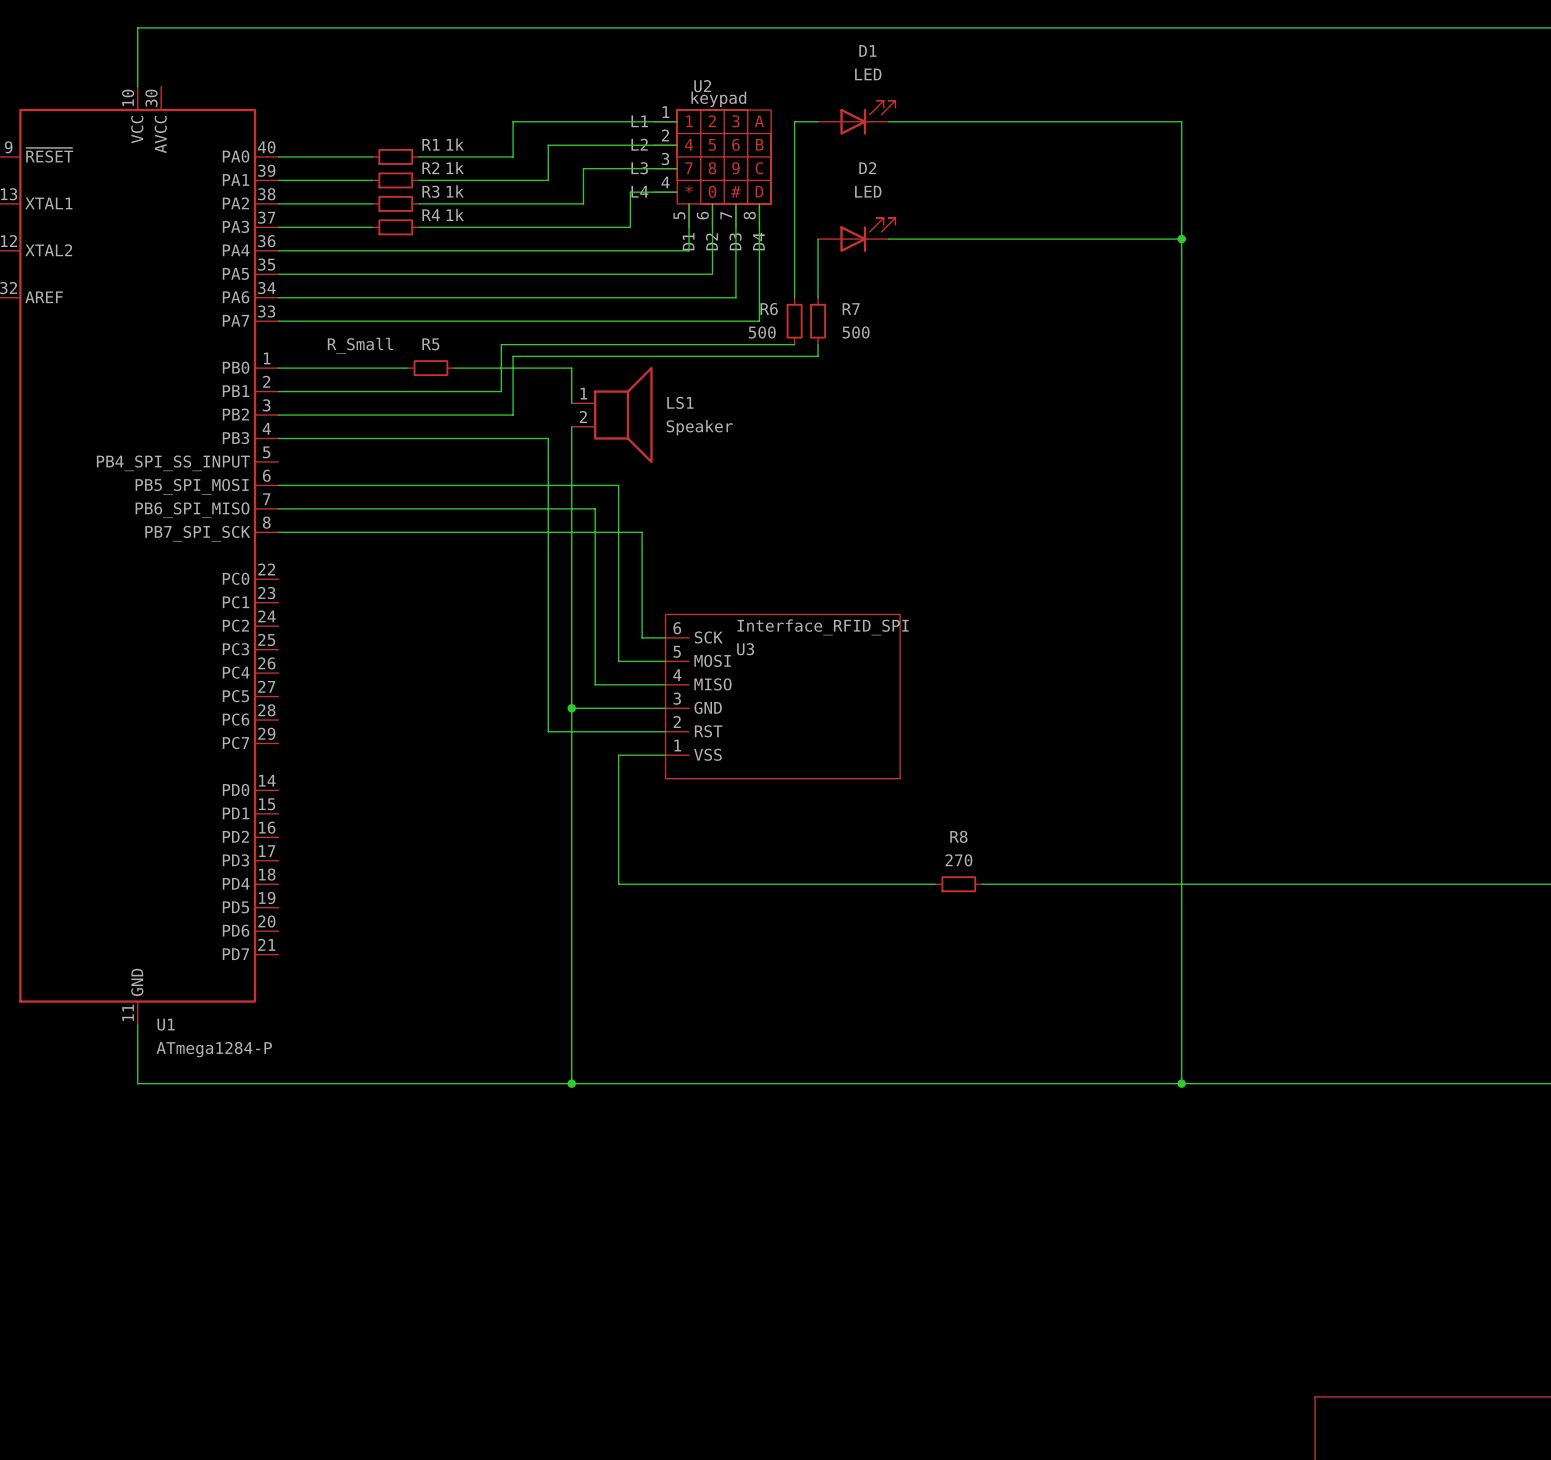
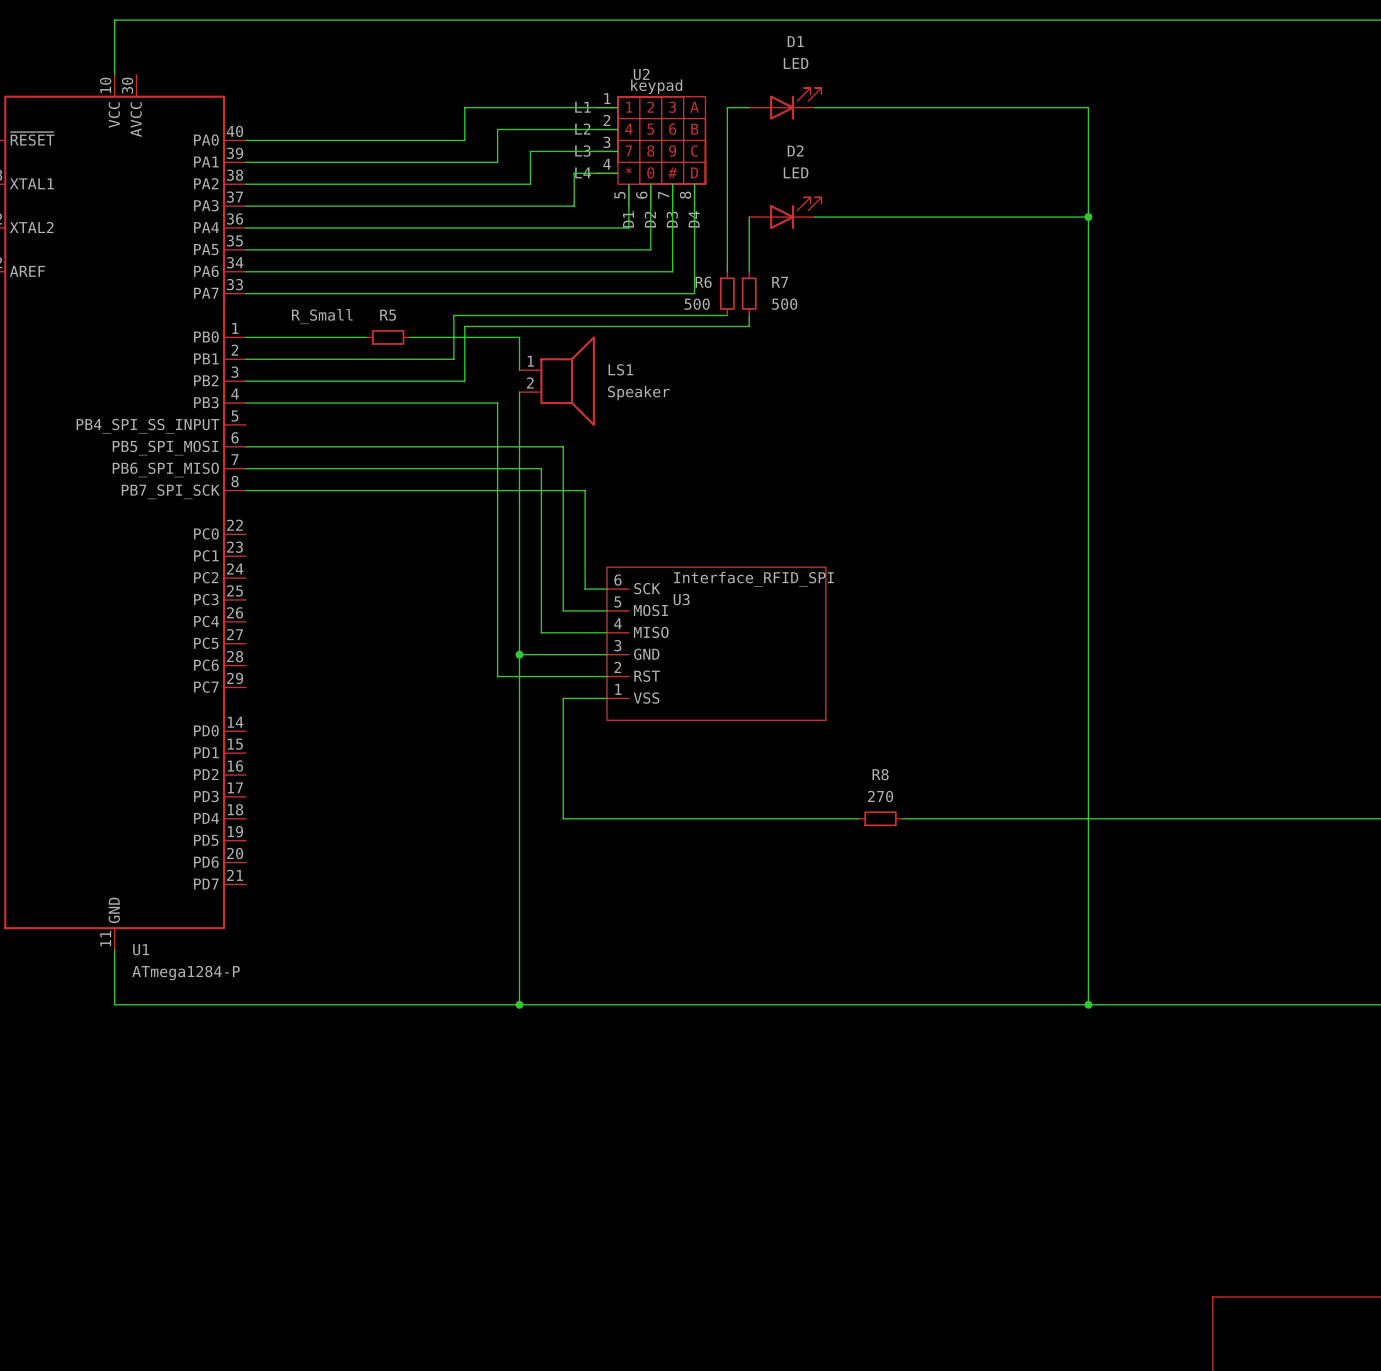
wire: none -> (333, 140) (377, 140)
R1: 1k (395, 156) -> none
wire: none -> (333, 162) (377, 162)
R2: 1k (395, 180) -> none
wire: none -> (333, 184) (377, 184)
R3: 1k (395, 203) -> none
wire: none -> (333, 206) (377, 206)
R4: 1k (395, 227) -> none

